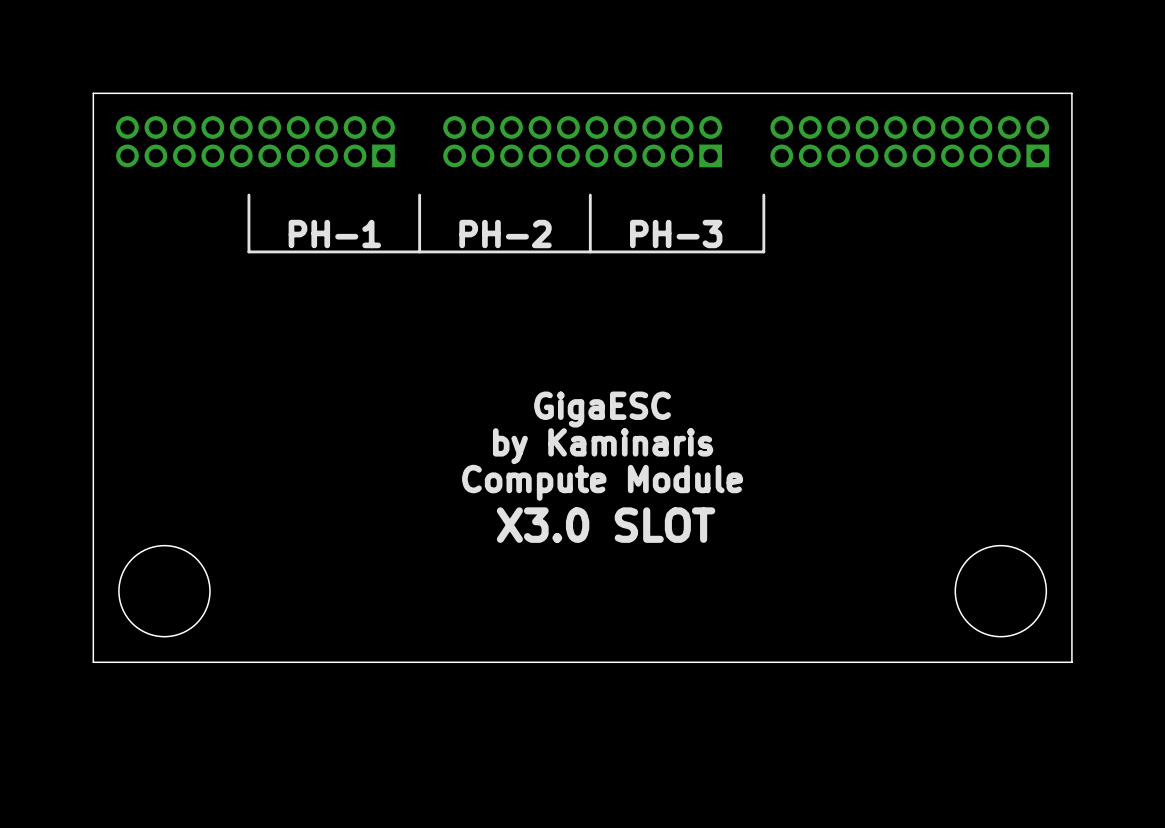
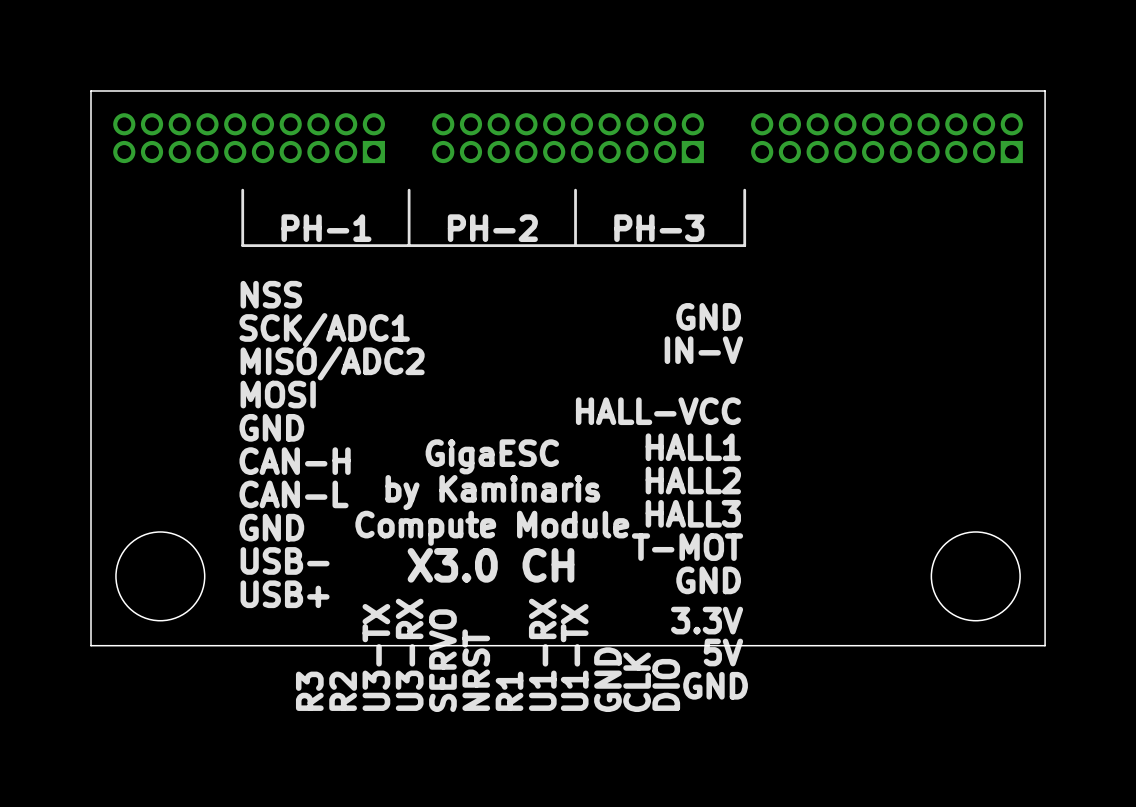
text: none -> NSS (271, 294)
text: none -> GND (708, 316)
text: none -> SCK/ADC1 (324, 330)
text: none -> IN-V (703, 350)
text: none -> MISO/ADC2 (332, 363)
text: none -> MOSI (278, 394)
text position: GigaESC (602, 409) -> GigaESC (492, 456)
text: none -> HALL-VCC (658, 411)
text: none -> GND (271, 427)
text position: by Kaminaris (603, 446) -> by Kaminaris (492, 492)
text: none -> HALL1 (693, 447)
text: none -> CAN-H (295, 461)
text position: Compute Module (602, 482) -> Compute Module (492, 528)
text: none -> HALL2 (693, 480)
text: none -> CAN-L (294, 494)
text: X3.0 SLOT (606, 525) -> X3.0 CH (491, 565)
text: none -> HALL3 (693, 513)
text: none -> GND (271, 527)
text: none -> T-MOT (687, 547)
text: none -> USB- (285, 560)
text: none -> GND (708, 580)
text: none -> USB+ (285, 594)
text: none -> 3.3V (707, 620)
text: none -> 5V (723, 652)
text: none -> U3-RX (409, 654)
text: none -> U1-RX (542, 654)
text: none -> U3-TX (376, 657)
text: none -> U1-TX (574, 657)
text: none -> SERVO (442, 660)
text: none -> NRST (476, 670)
text: none -> GND (607, 679)
text: none -> CLK (637, 682)
text: none -> DIO (666, 684)
text: none -> GND (715, 685)
text: none -> R3 (309, 691)
text: none -> R2 (343, 691)
text: none -> R1 (509, 691)

